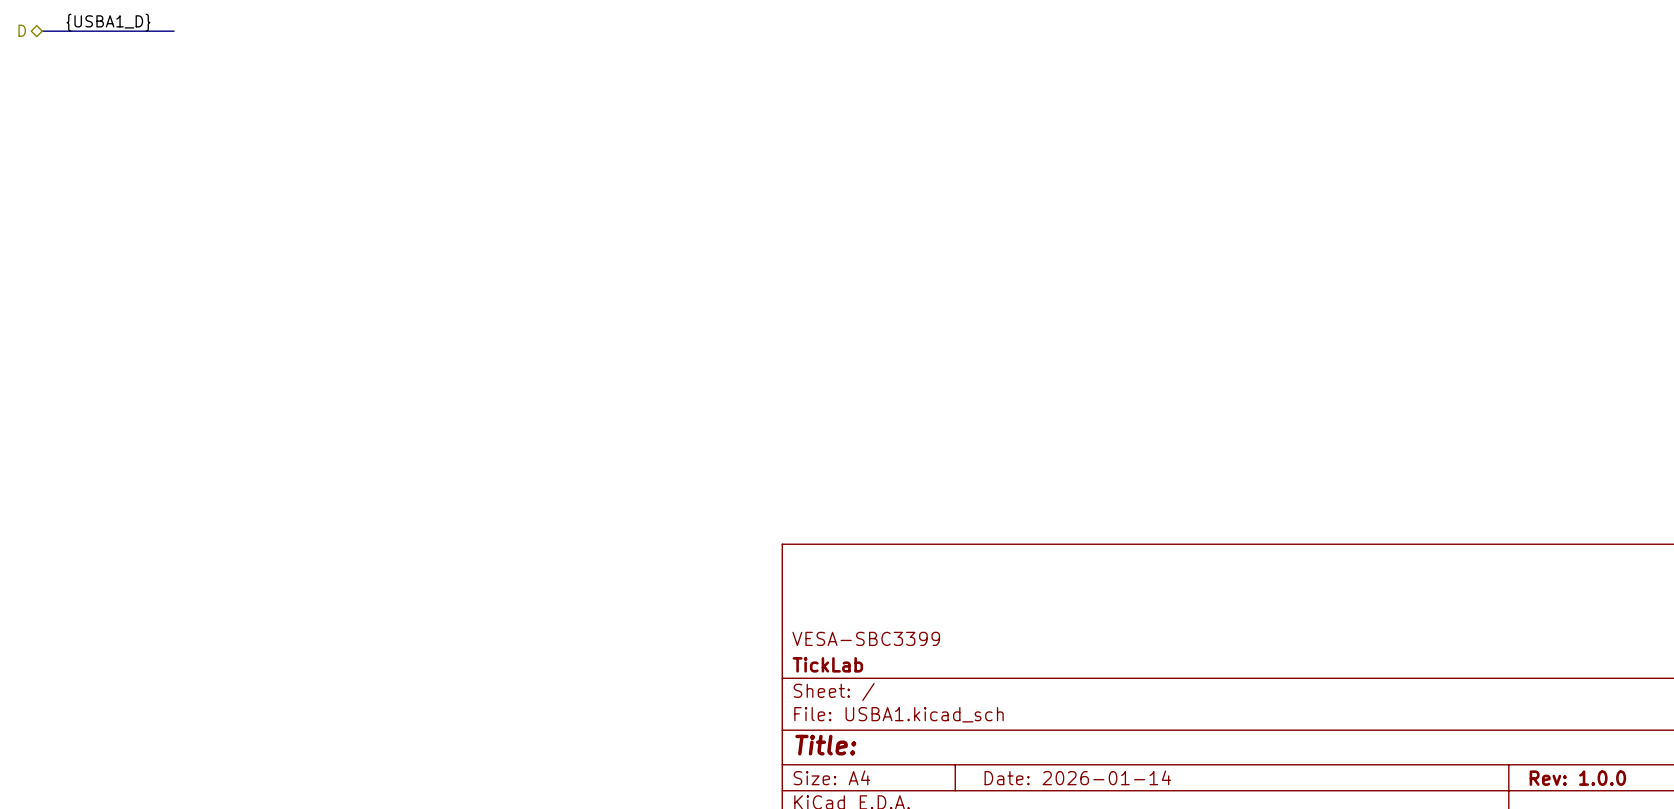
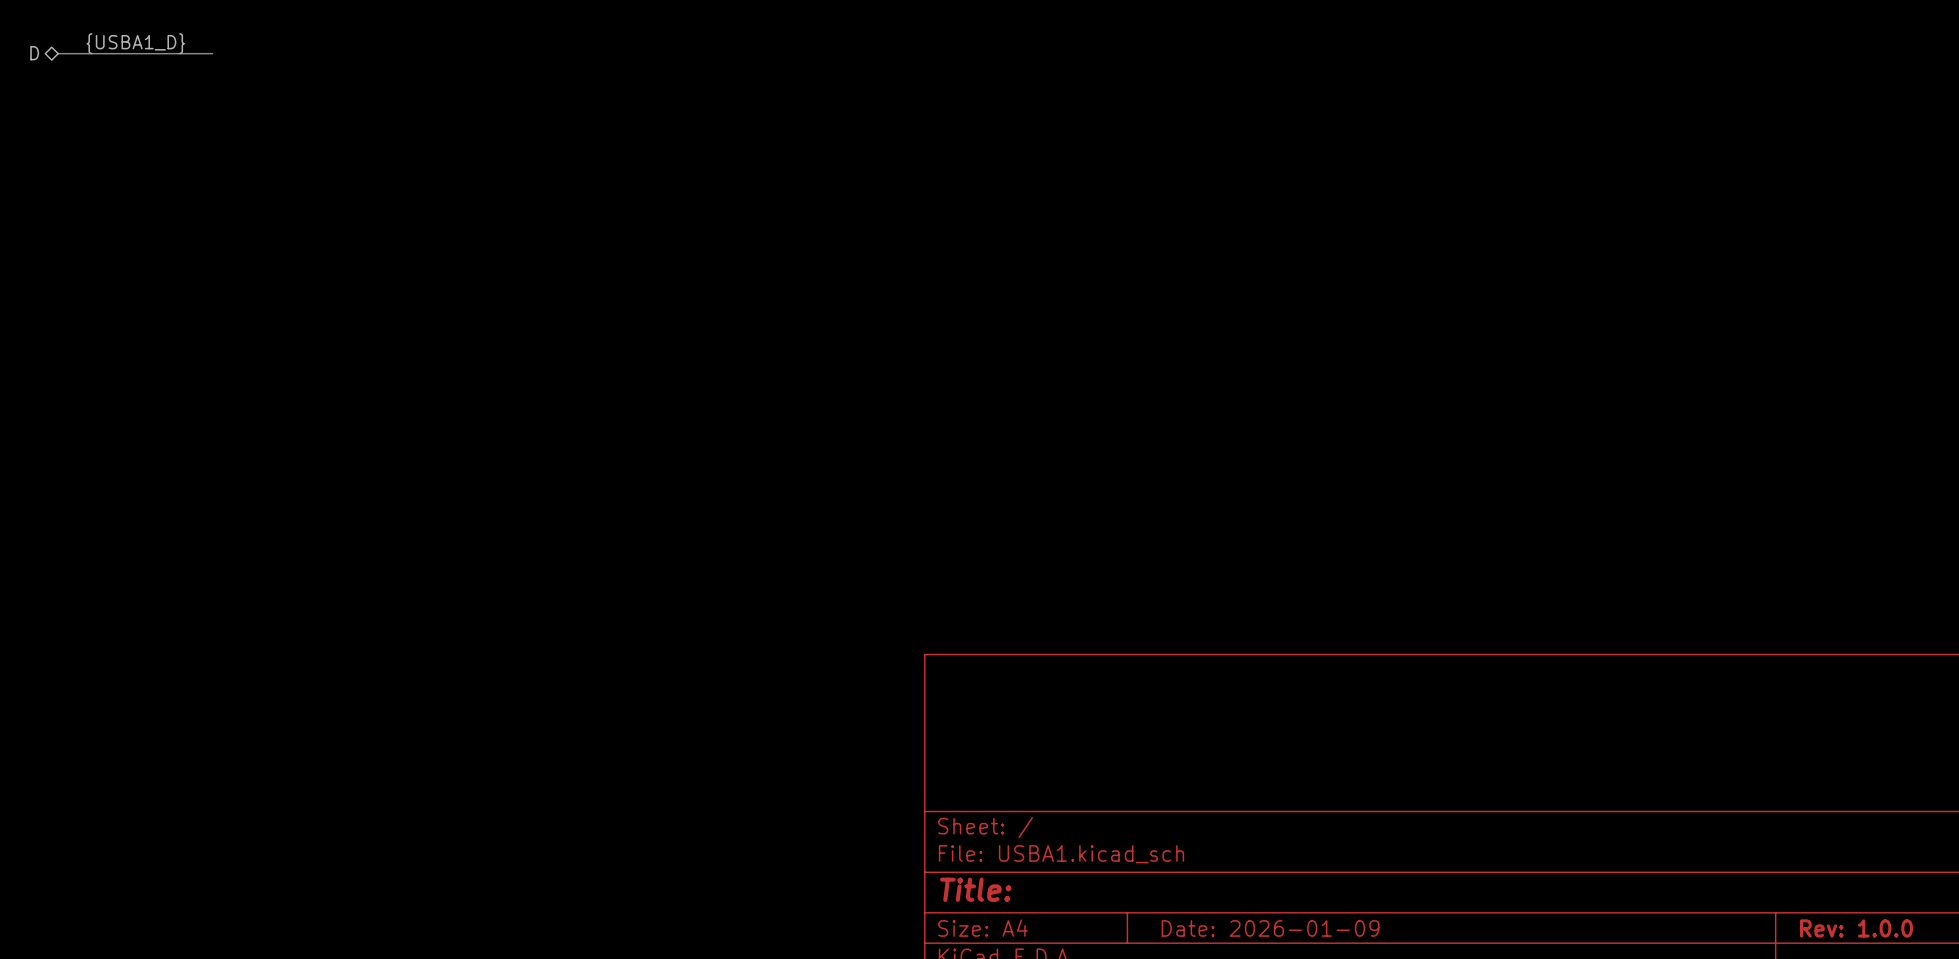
title block: VESA-SBC3399 (866, 638) -> none
title block: TickLab (827, 664) -> none
title block: Date: 2026-01-14 (1077, 777) -> Date: 2026-01-09 (1270, 928)

